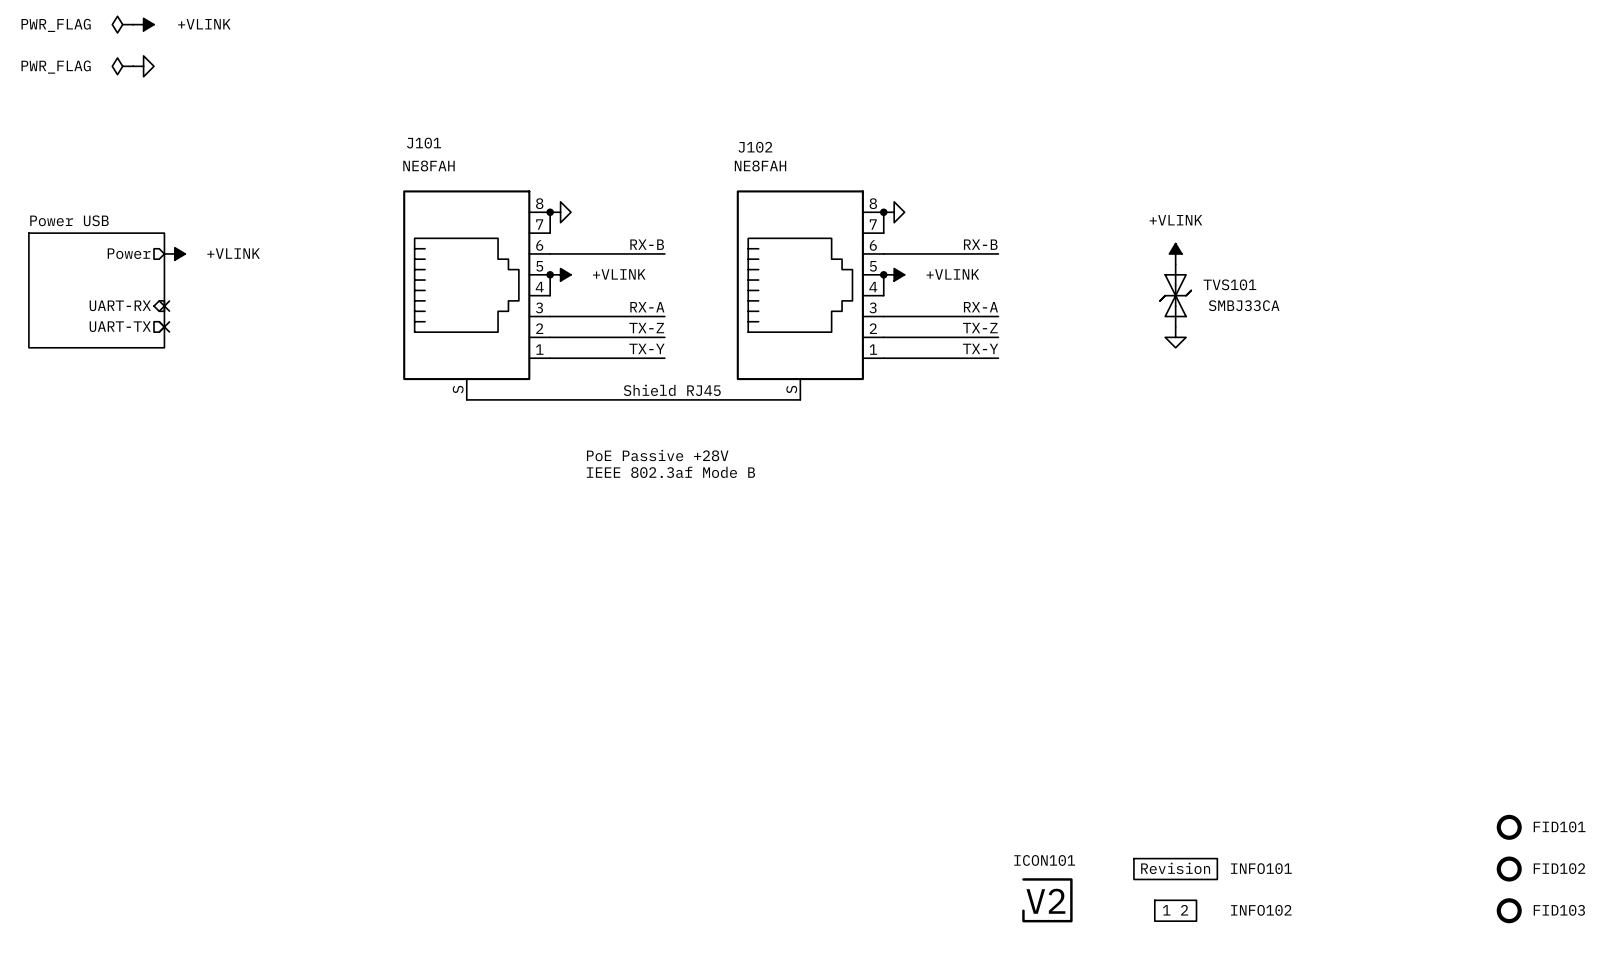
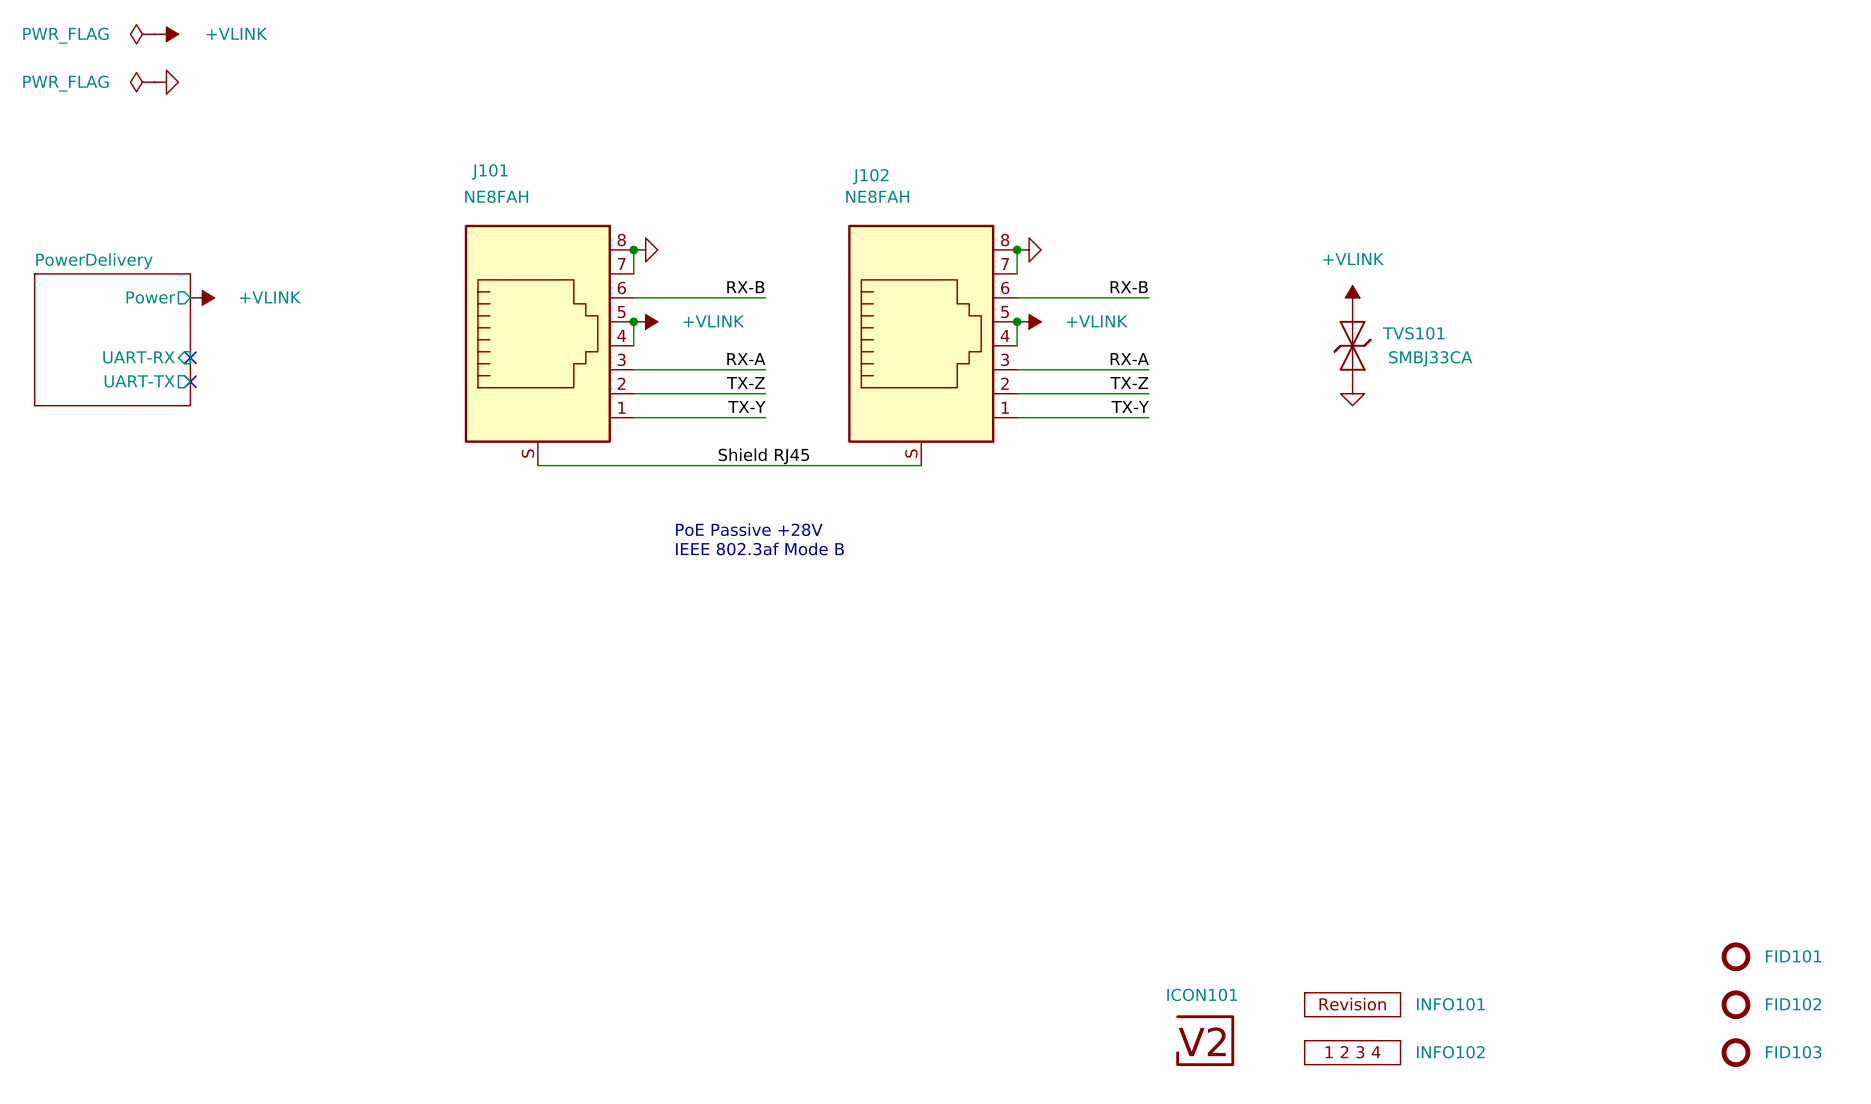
sheet Power USB name: Power USB (69, 220) -> PowerDelivery (94, 261)
INFO102 symbol: [1154, 900, 1197, 922] -> [1304, 1040, 1401, 1065]

